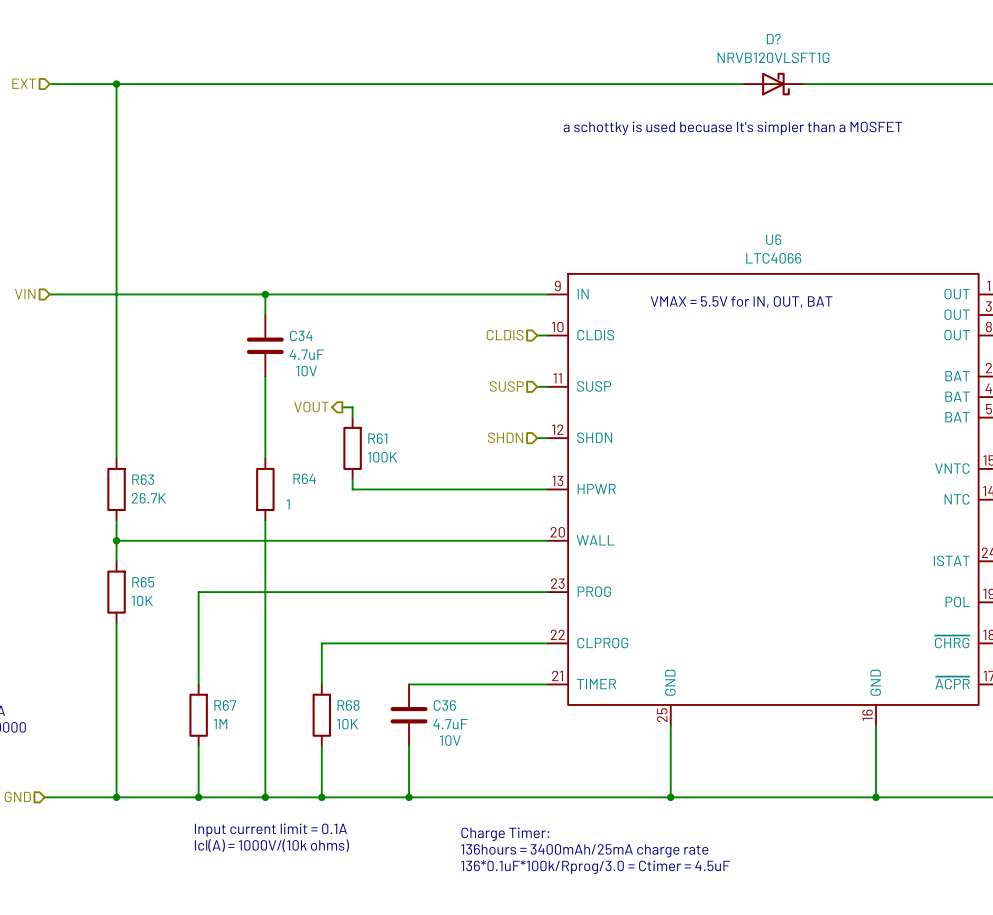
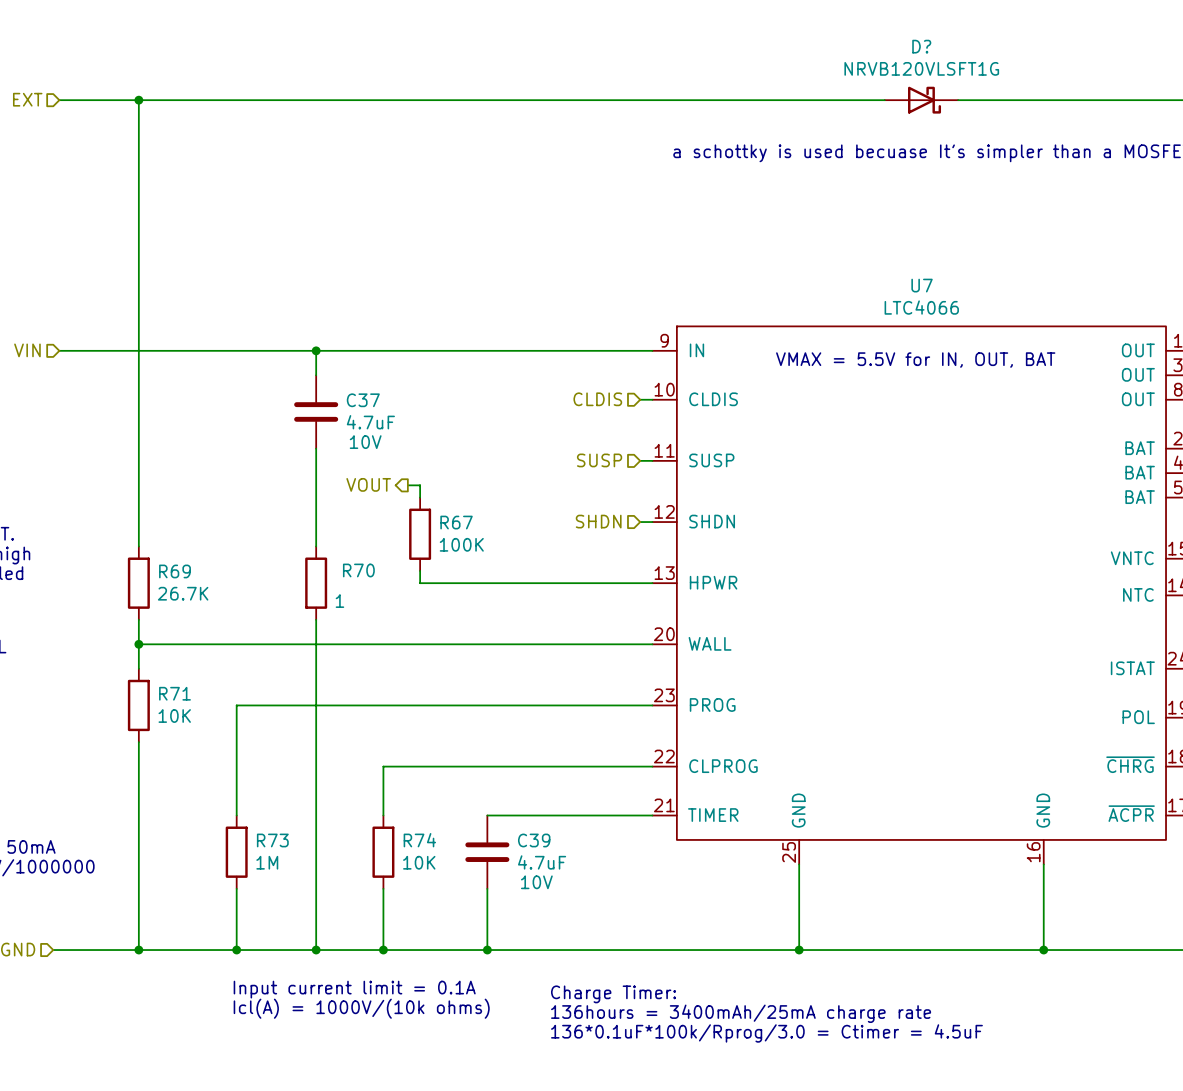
U6 name: U6 (773, 239) -> U7 (922, 285)
C34 name: C34 (301, 335) -> C37 (363, 400)
R61 name: R61 (377, 438) -> R67 (456, 522)
R64 name: R64 (304, 478) -> R70 (358, 570)
R63 name: R63 (143, 479) -> R69 (174, 571)
R65 name: R65 (143, 582) -> R71 (174, 693)
R67 name: R67 (225, 705) -> R73 (272, 840)
R68 name: R68 (348, 705) -> R74 (419, 840)
C36 name: C36 (444, 705) -> C39 (534, 840)

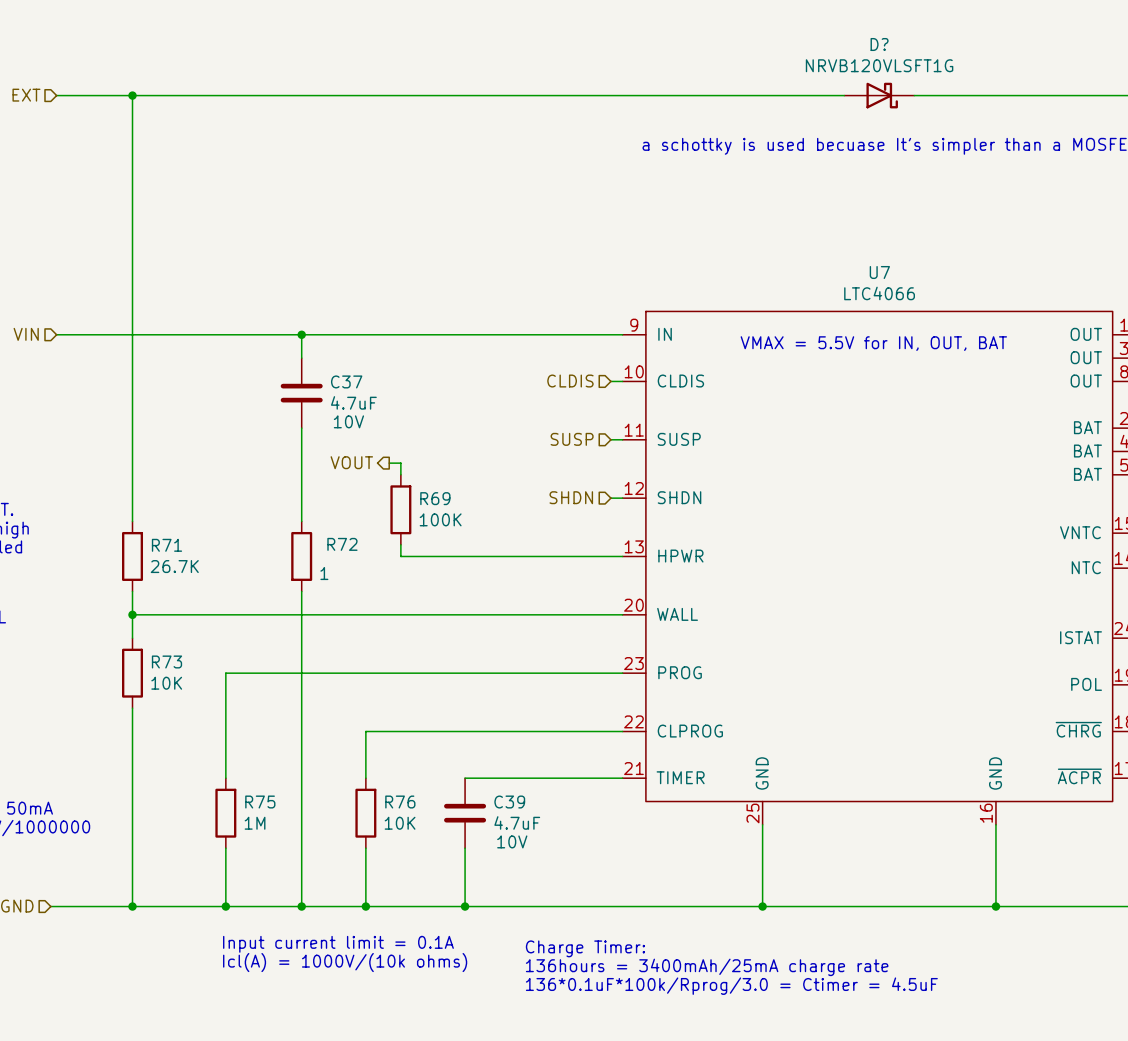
R67 name: R67 (456, 522) -> R69 (435, 498)
R70 name: R70 (358, 570) -> R72 (342, 544)
R69 name: R69 (174, 571) -> R71 (166, 545)
R71 name: R71 (174, 693) -> R73 (166, 661)
R73 name: R73 (272, 840) -> R75 (260, 802)
R74 name: R74 (419, 840) -> R76 (400, 802)

